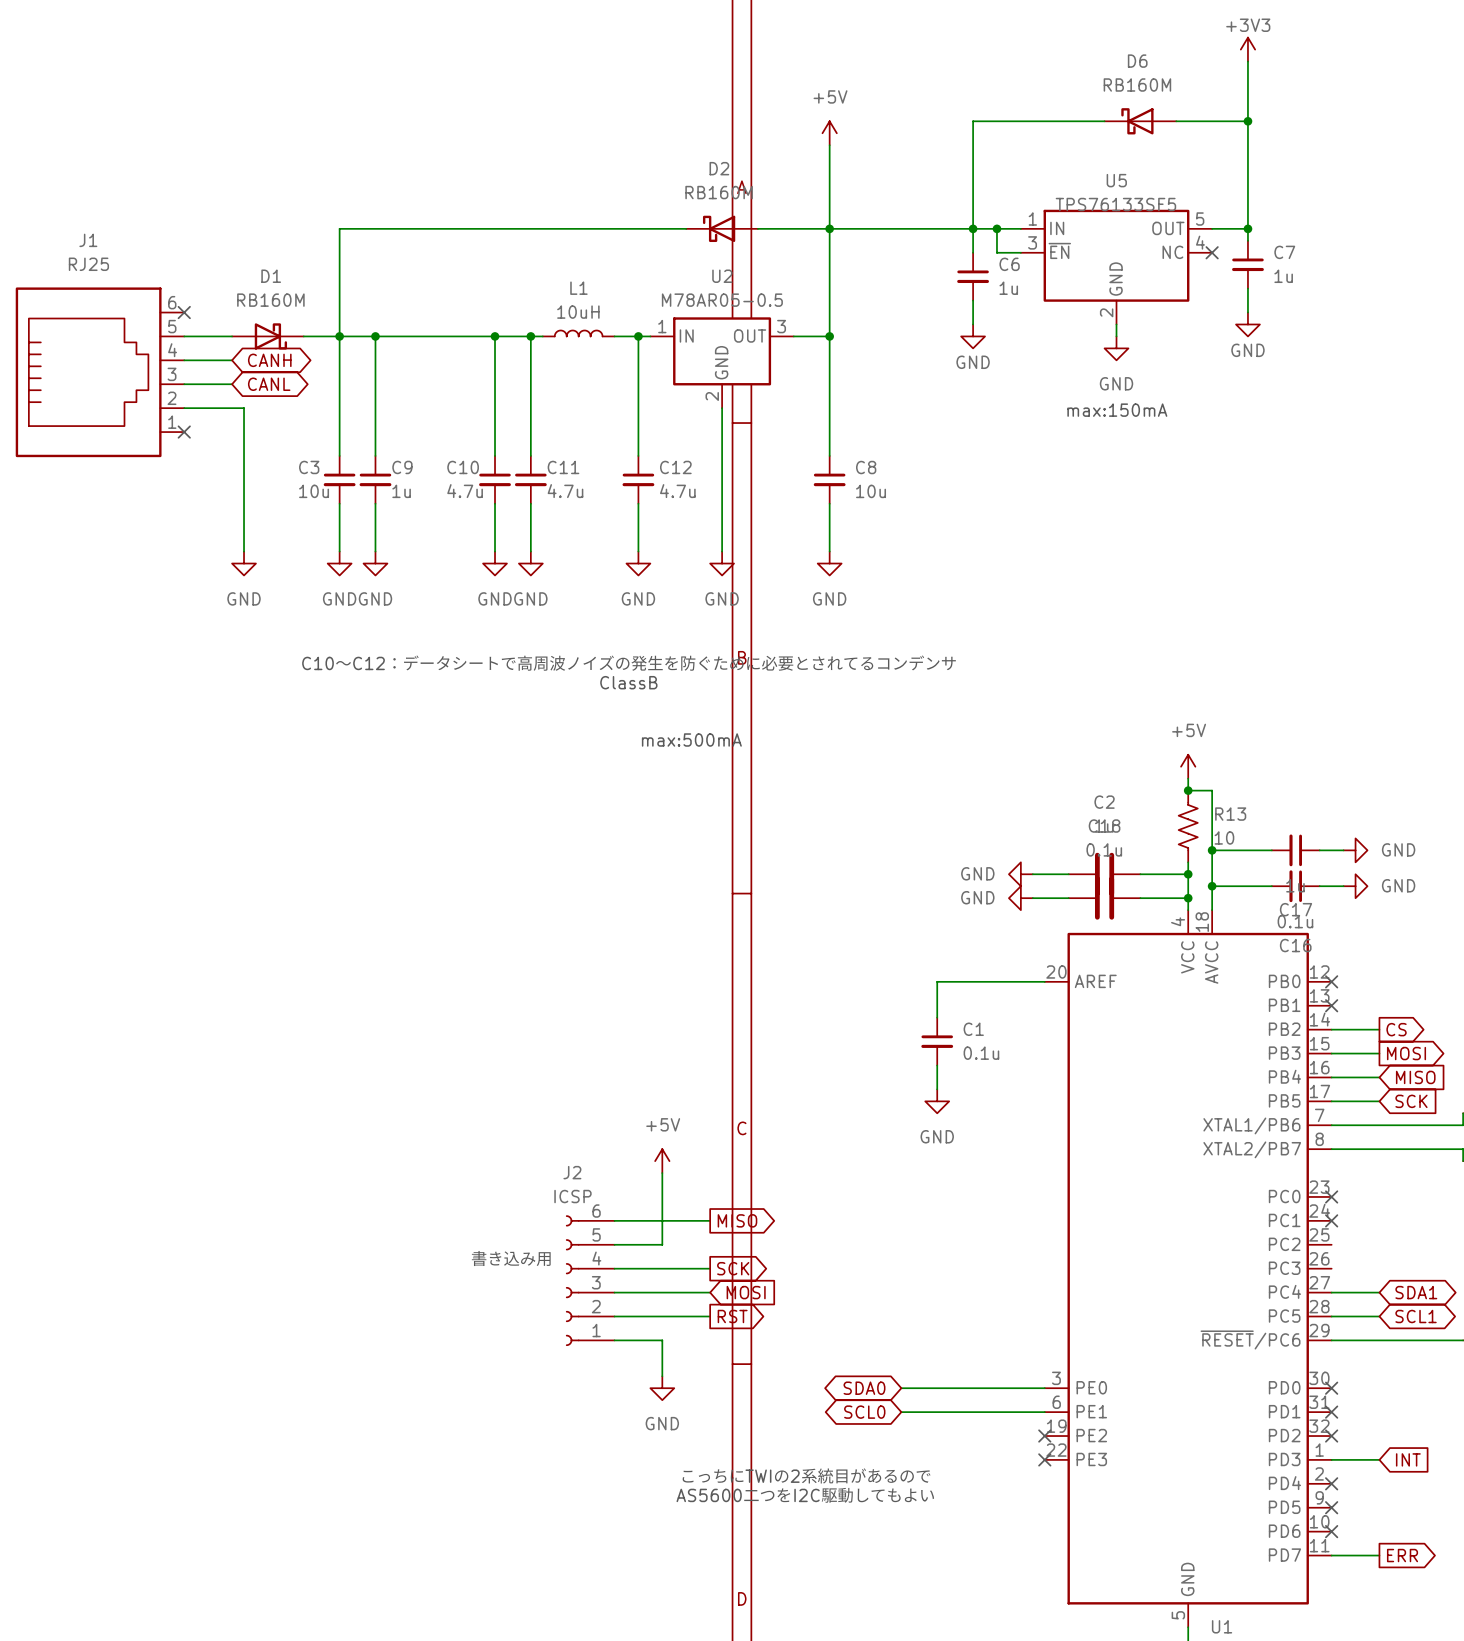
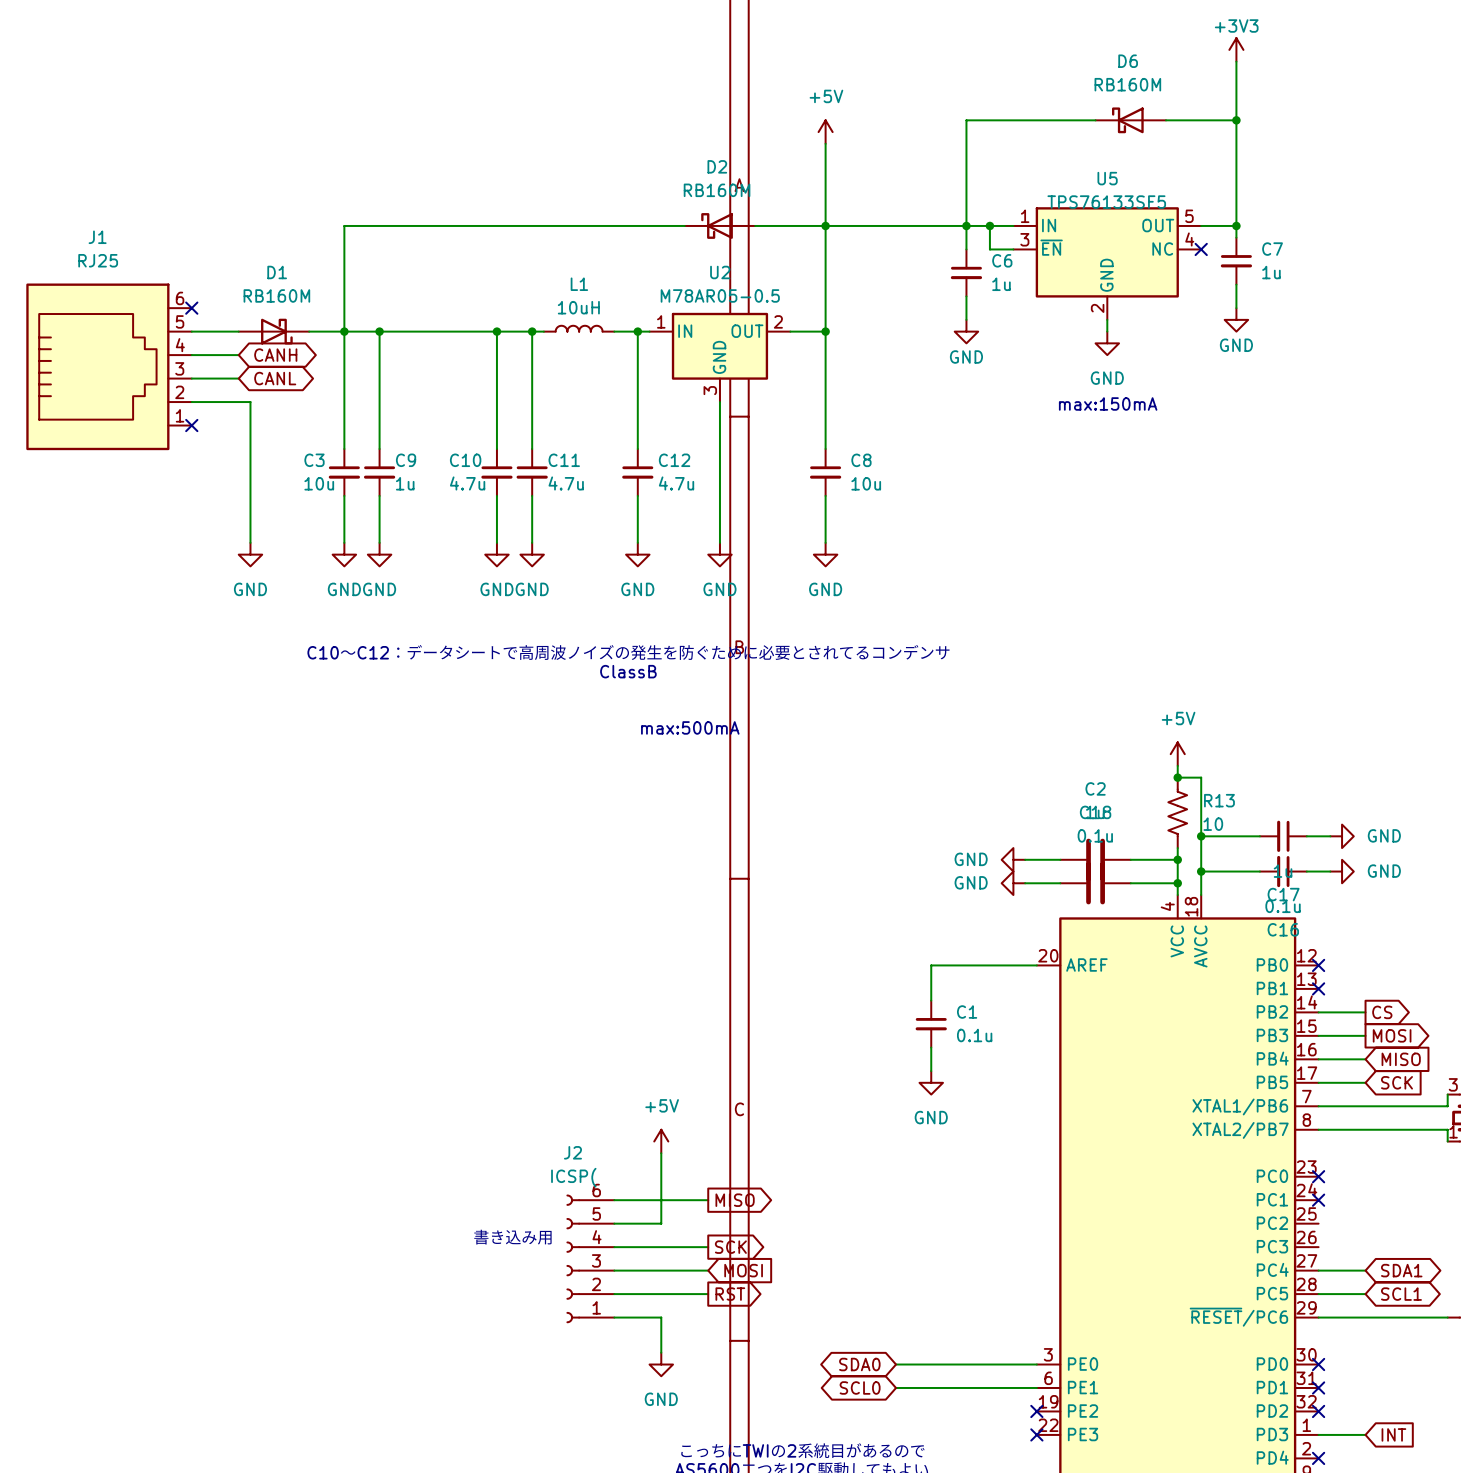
U2 pin number: 3 (781, 326) -> 2 (778, 321)
U2 pin number: 2 (712, 396) -> 3 (710, 390)
J2 value: ICSP (572, 1196) -> ICSP( (573, 1177)

